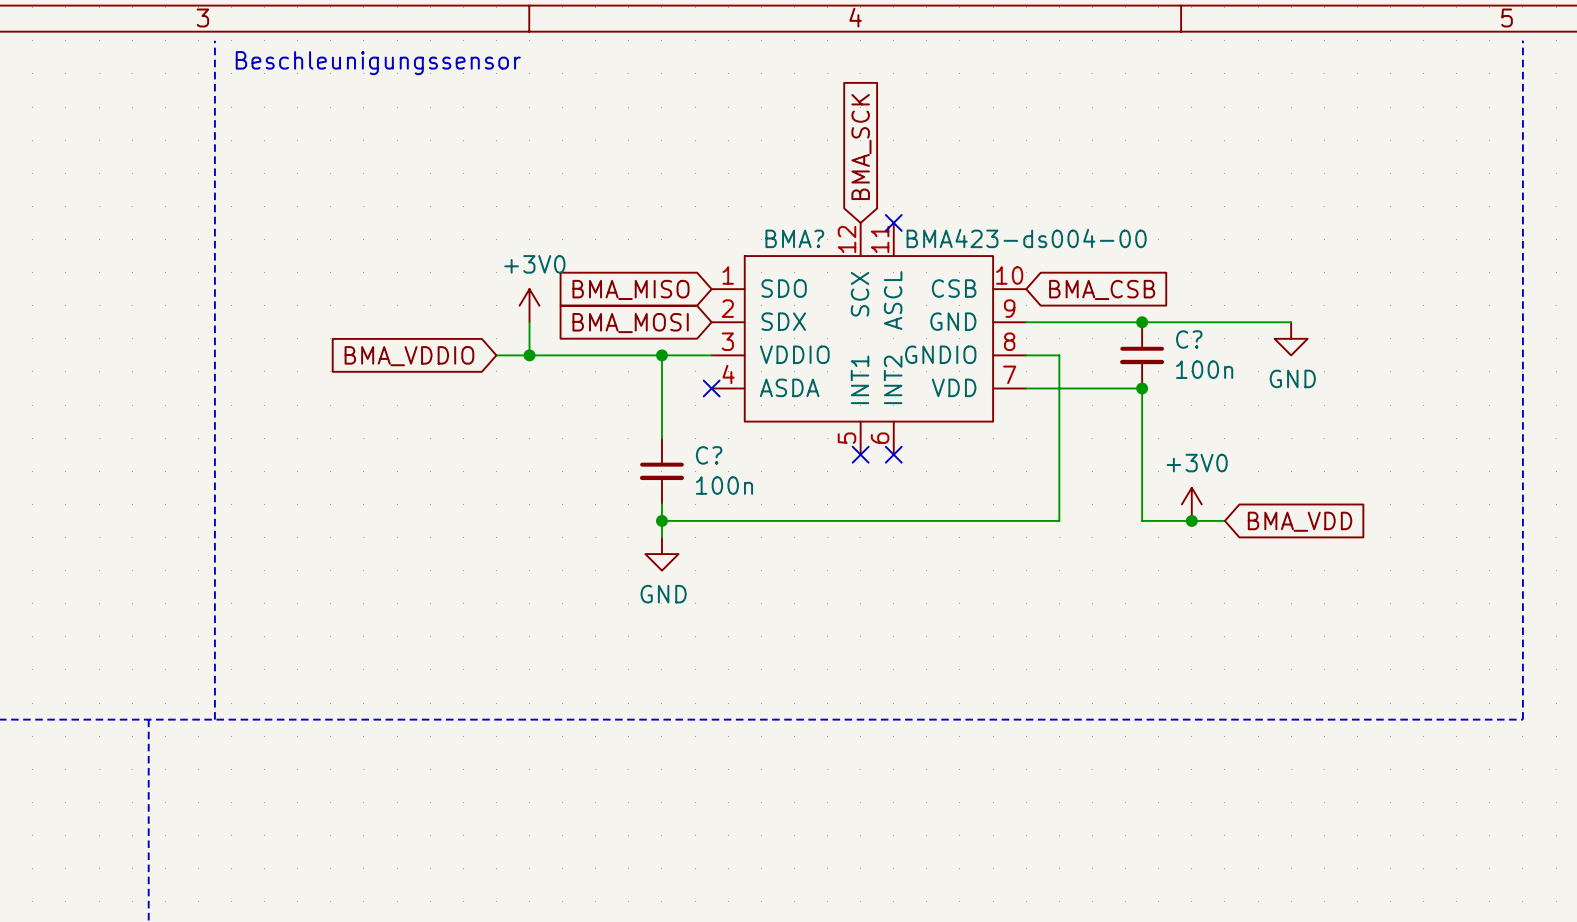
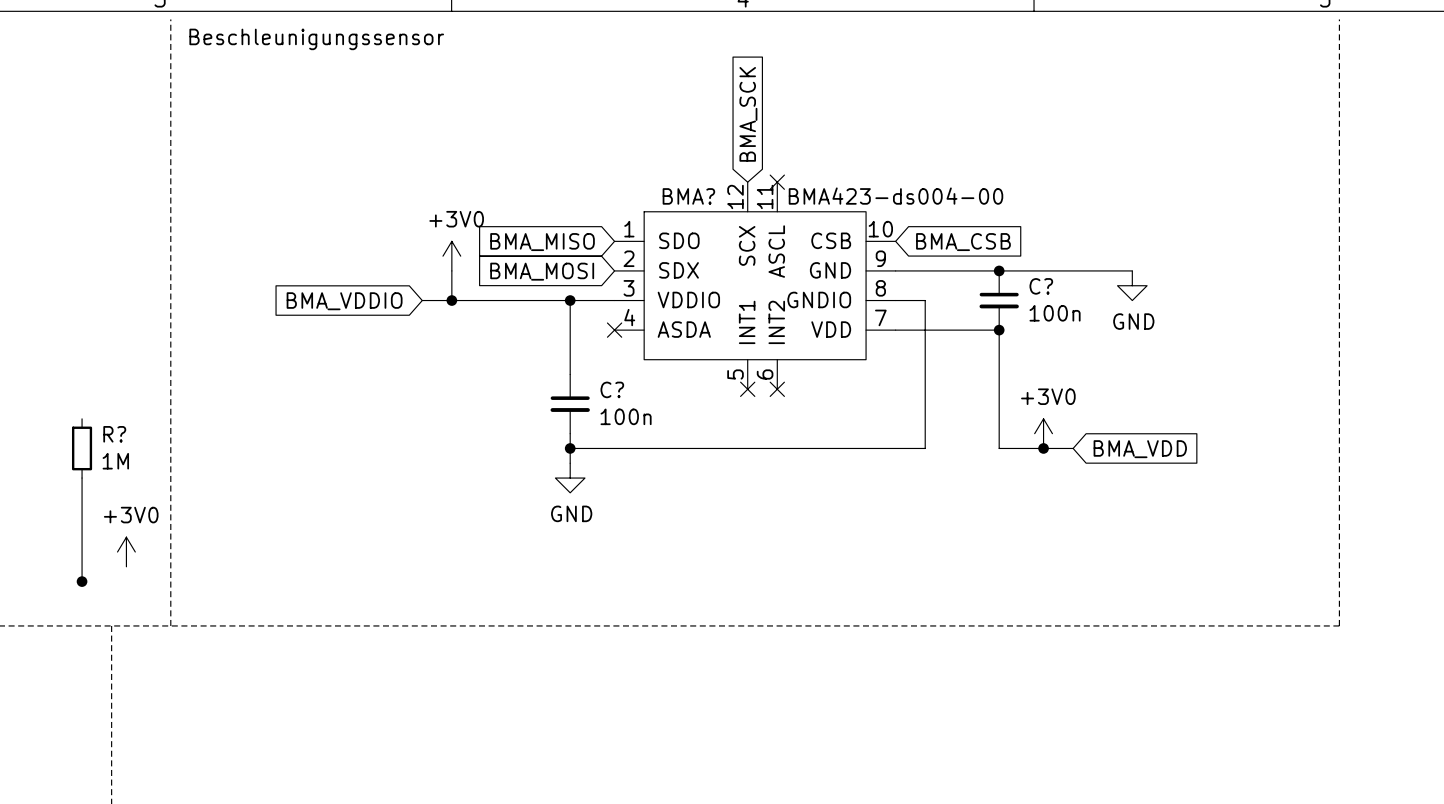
R?: none -> 1M (82, 448)
wire: none -> (82, 478) (82, 581)
power symbol: none -> +3V0 (126, 552)
junction: none -> (82, 581)

